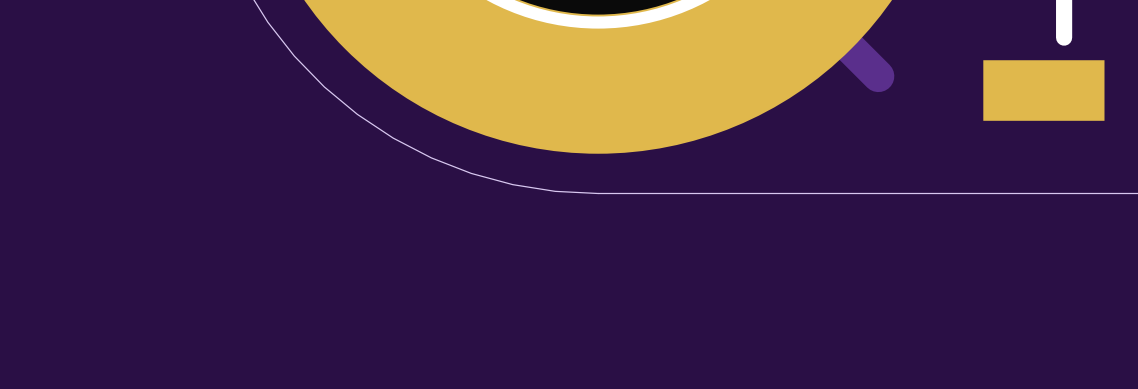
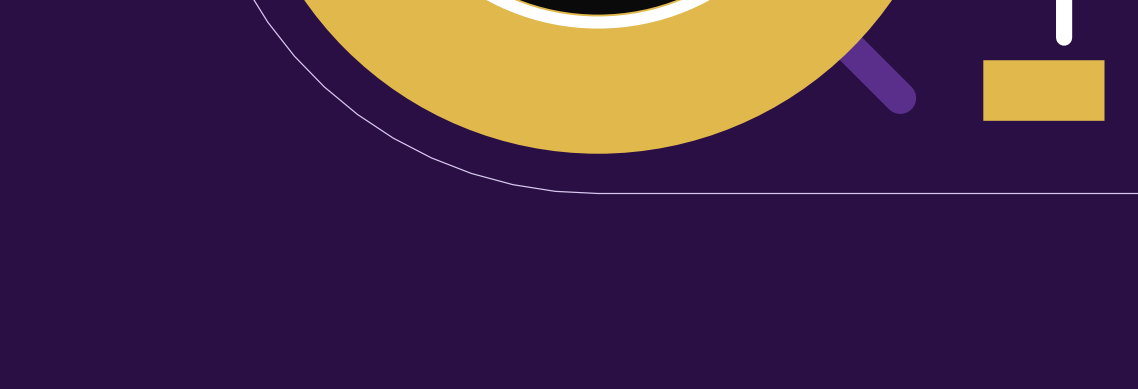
track: none -> (878, 76) (900, 98)

